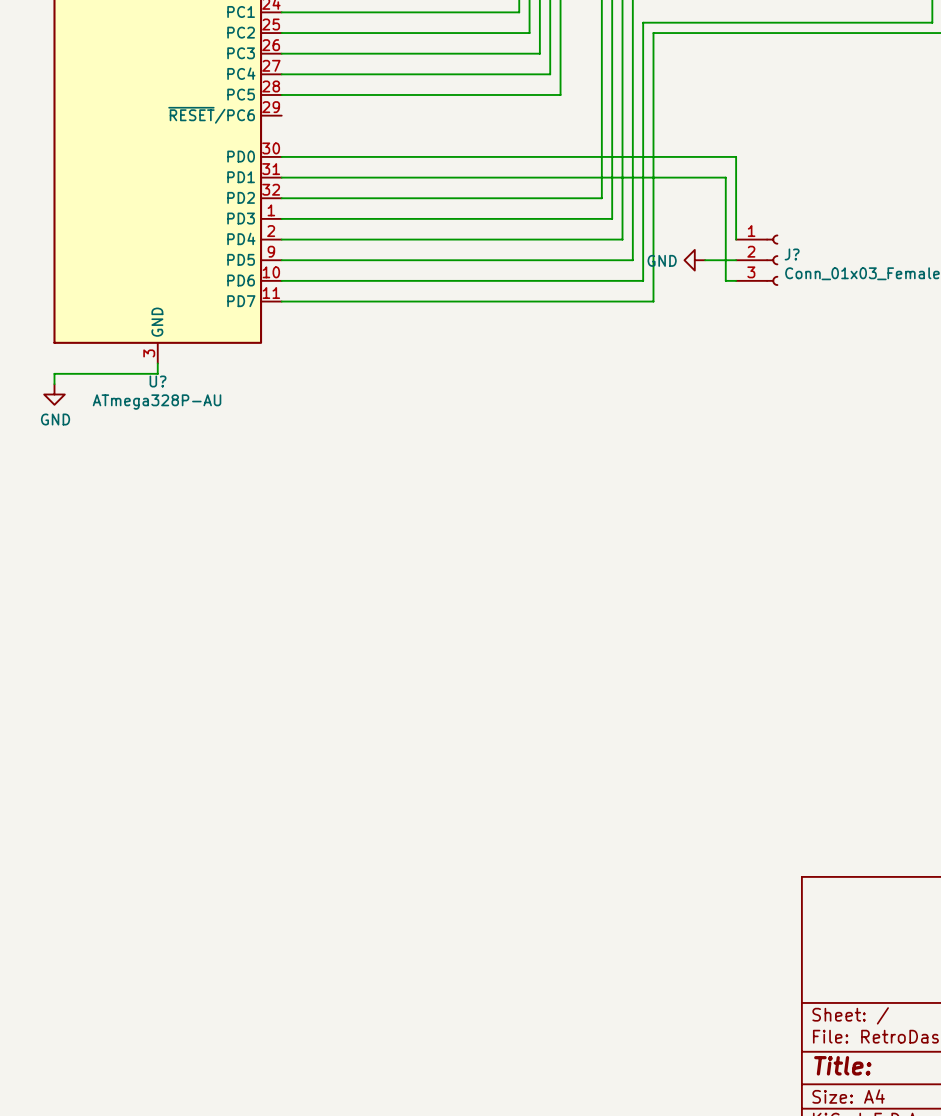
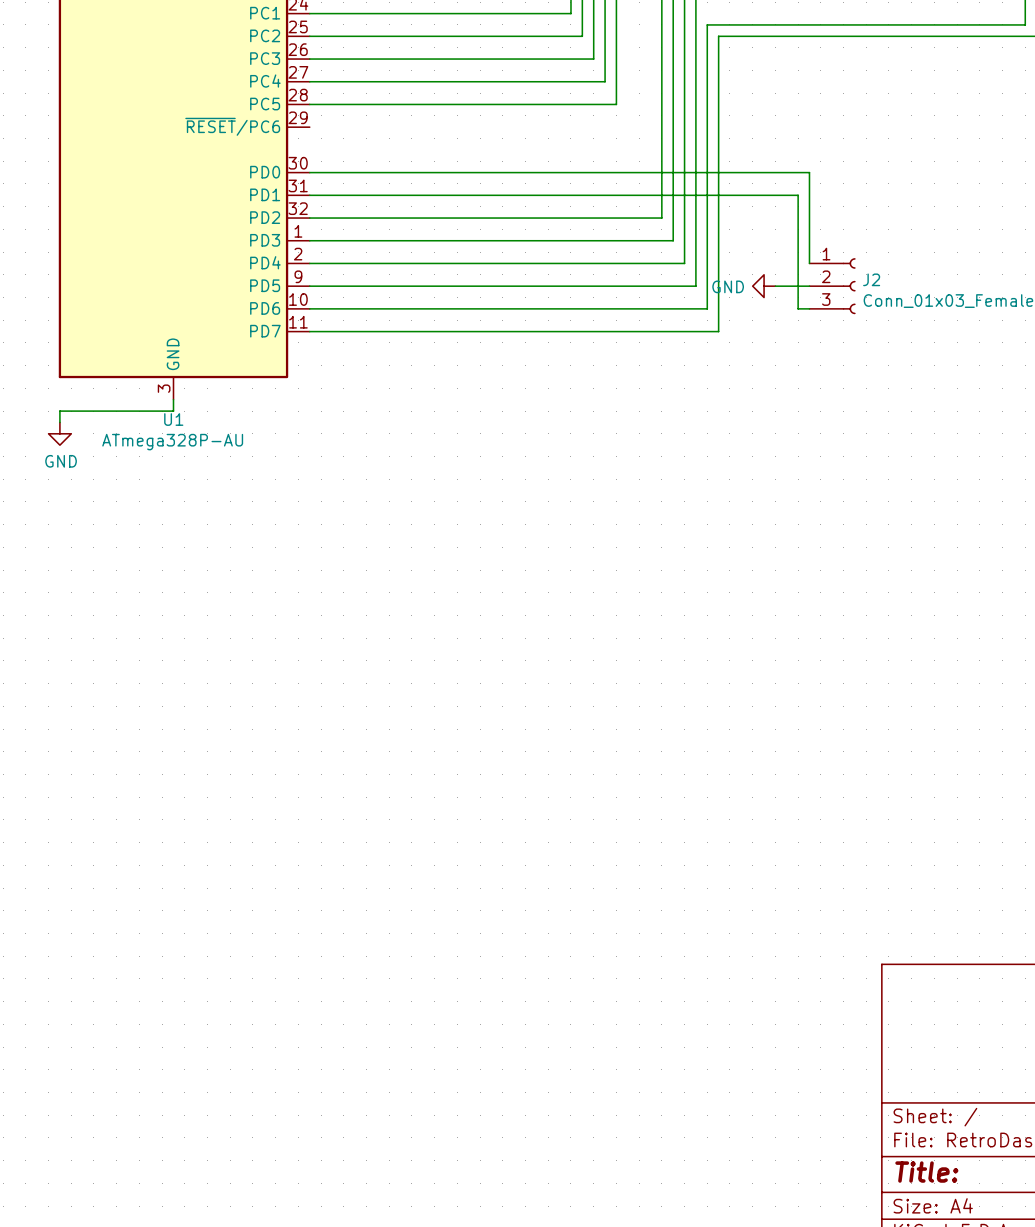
J? name: J? (792, 254) -> J2 (871, 279)
U? name: U? (158, 381) -> U1 (173, 419)

